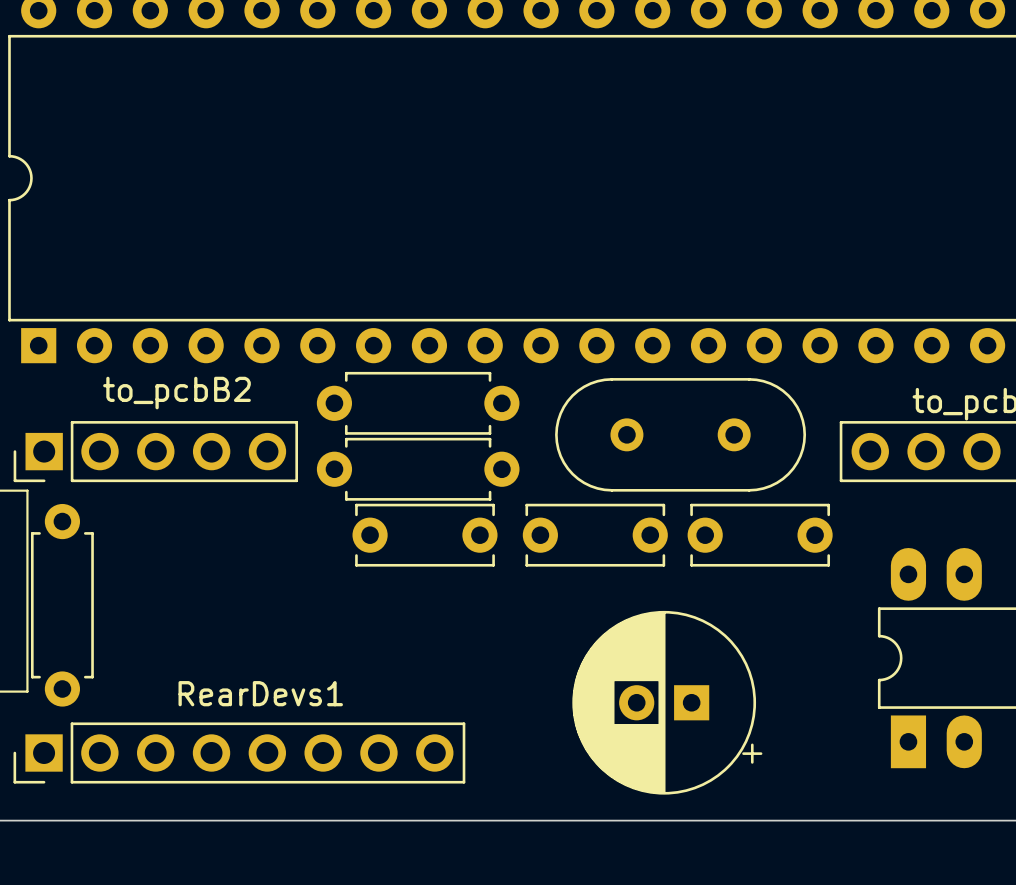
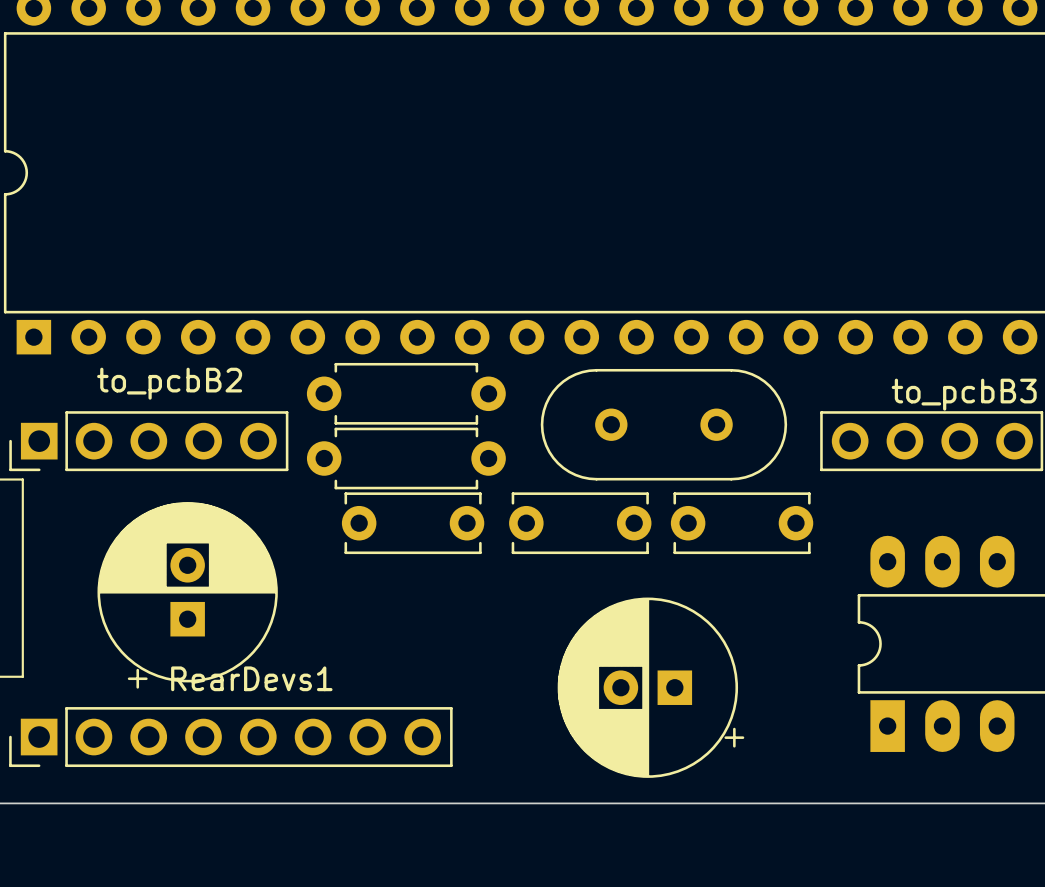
part: (62, 605) -> none
part: none -> (187, 595)

